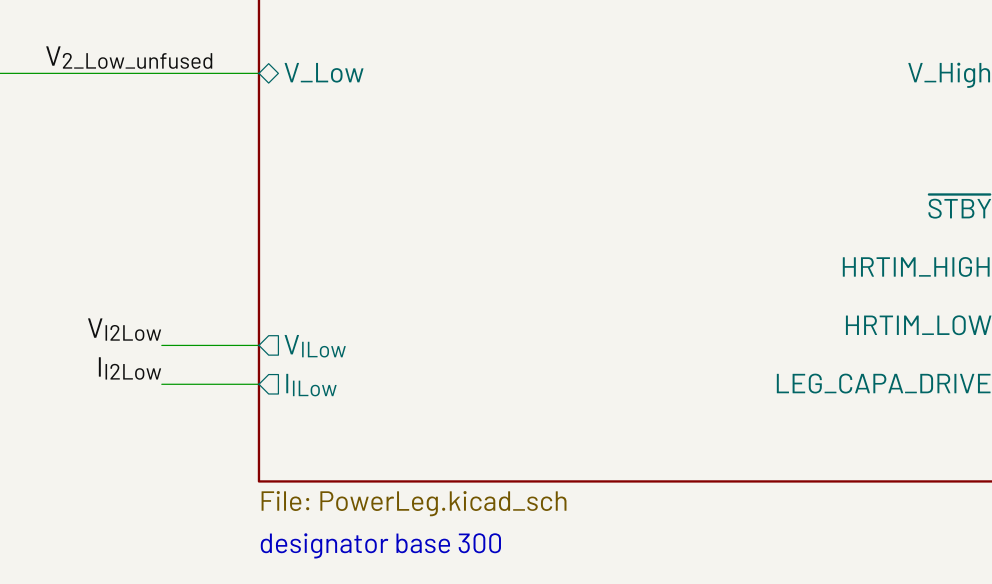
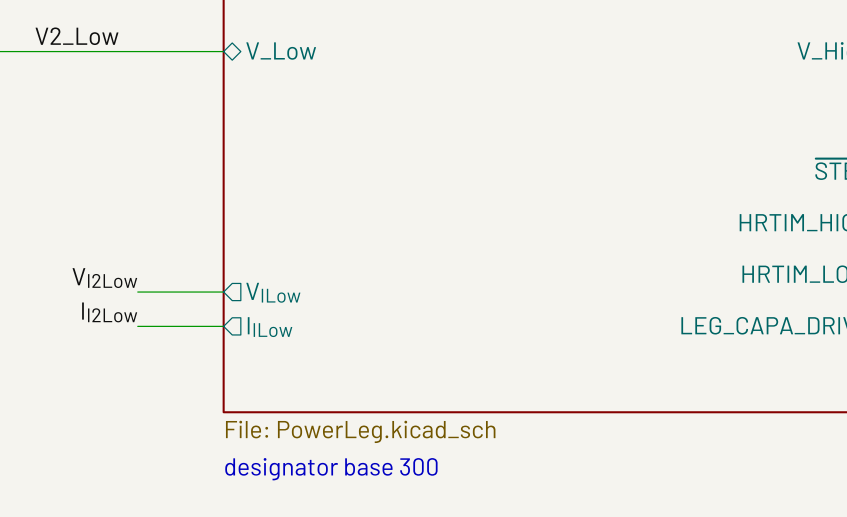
label: V2_Low_unfused (129, 57) -> V2_Low (77, 36)

